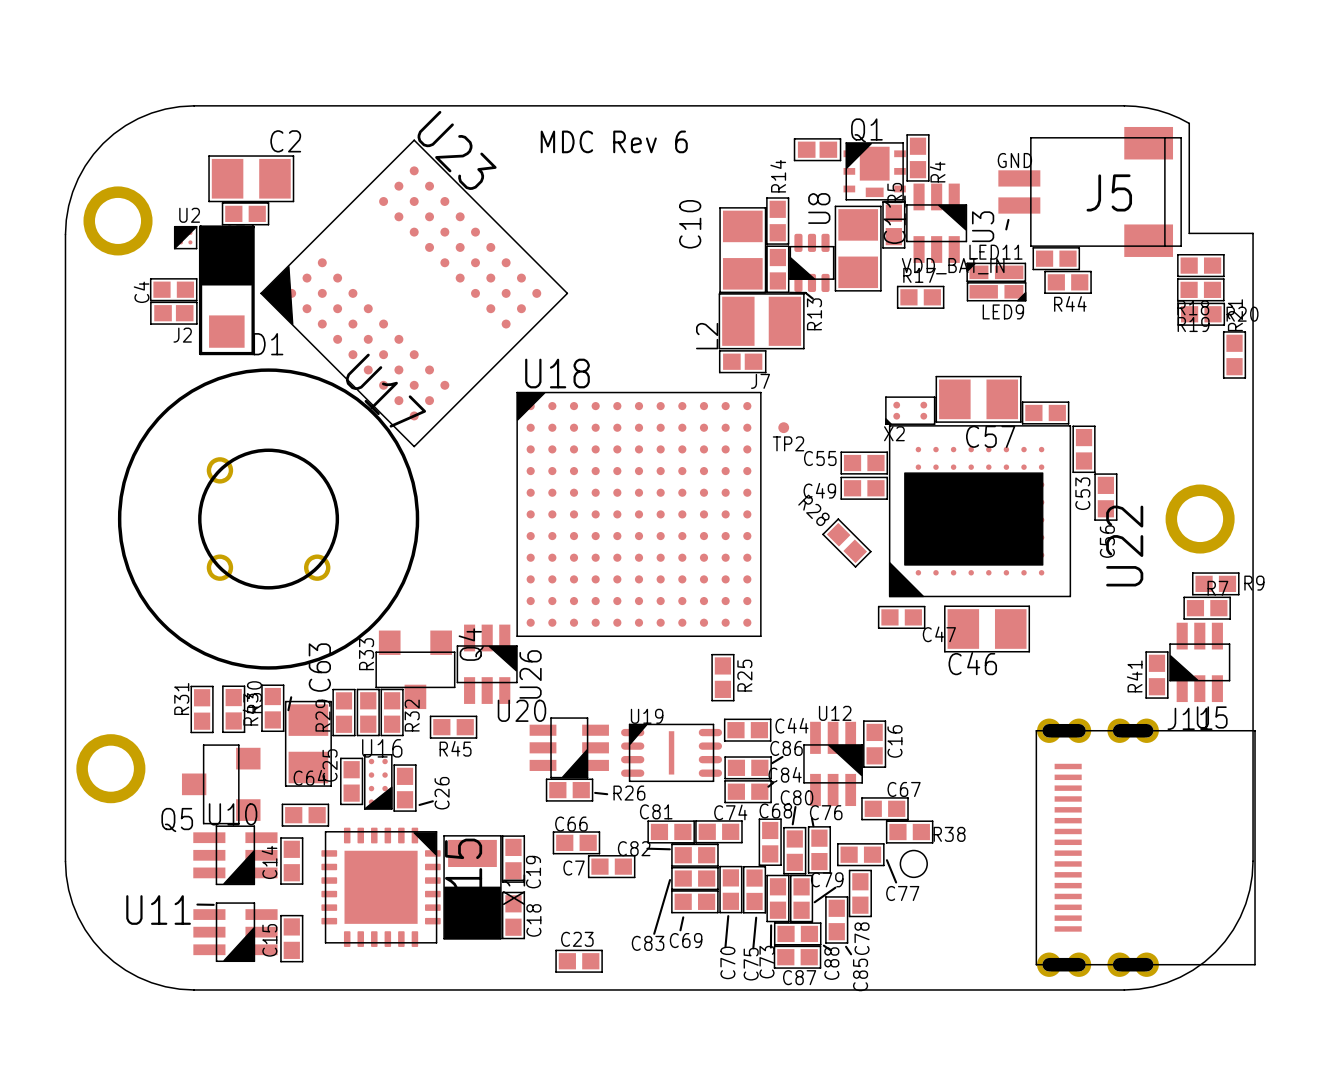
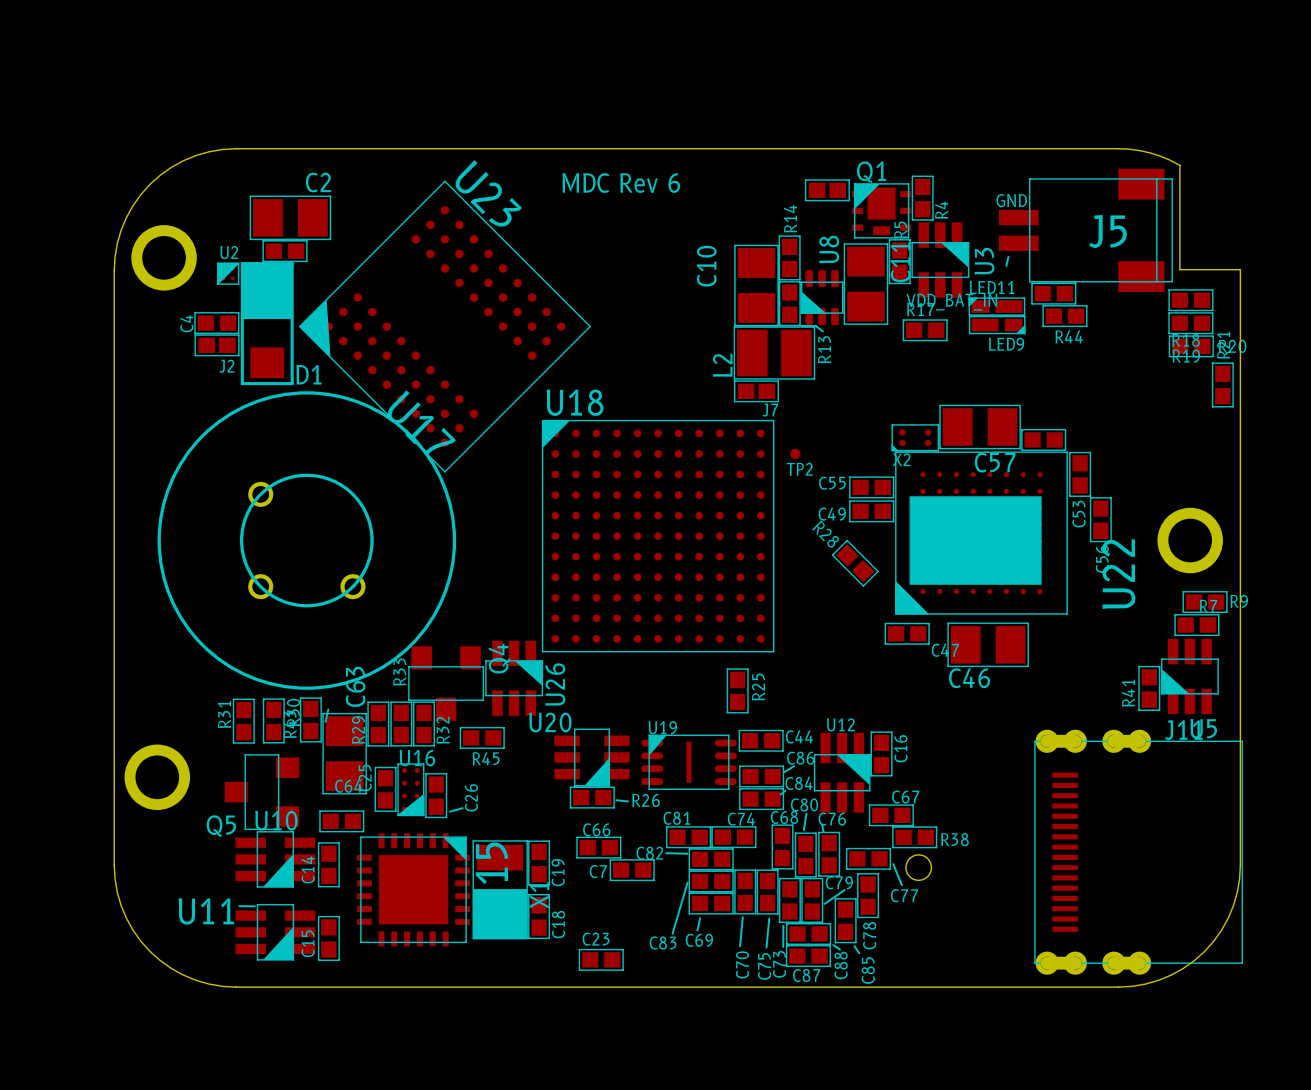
U17 footprint: [117, 368, 420, 670] -> [157, 391, 457, 690]

